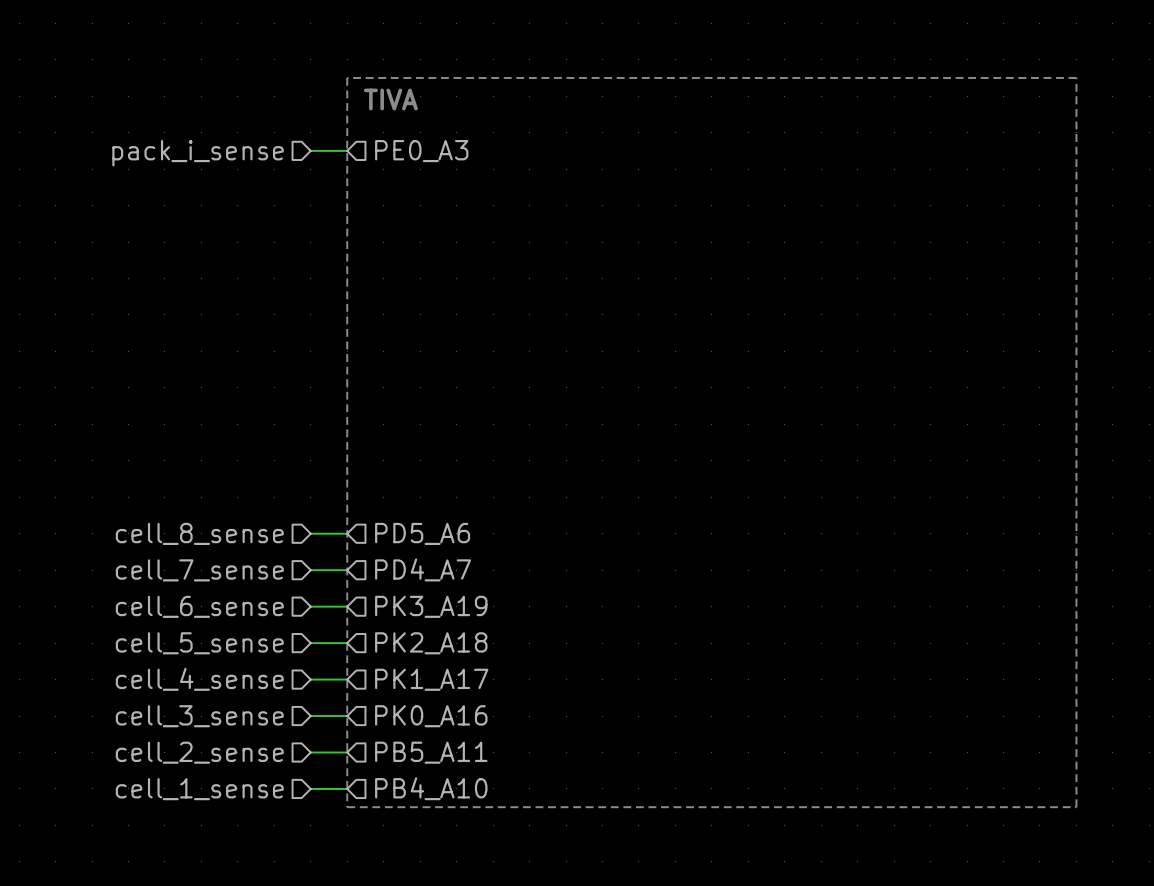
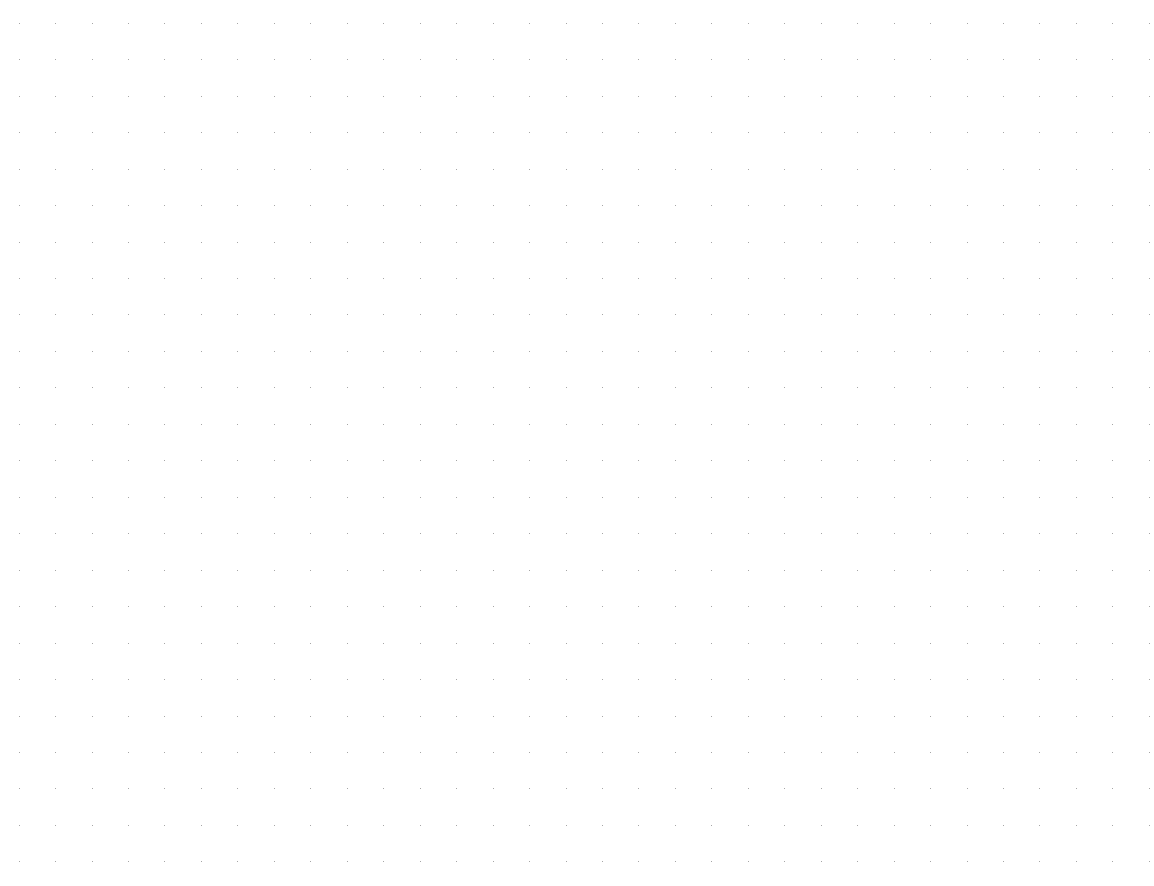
line: (347, 77) (347, 807) (1076, 807) (1076, 77) (347, 77) -> none
text: TIVA (390, 99) -> none
wire: (310, 150) (347, 150) -> none
hierarchical label: PE0_A3 (421, 151) -> none
hierarchical label: pack_i_sense (198, 153) -> none
hierarchical label: cell_8_sense (199, 533) -> none
wire: (310, 533) (347, 533) -> none
hierarchical label: PD5_A6 (422, 533) -> none
hierarchical label: PD4_A7 (423, 569) -> none
hierarchical label: cell_7_sense (199, 570) -> none
wire: (310, 570) (347, 570) -> none
hierarchical label: cell_6_sense (199, 606) -> none
wire: (310, 606) (347, 606) -> none
hierarchical label: PK3_A19 (431, 606) -> none
hierarchical label: cell_5_sense (199, 643) -> none
wire: (310, 643) (347, 643) -> none
hierarchical label: PK2_A18 (431, 643) -> none
hierarchical label: cell_4_sense (199, 679) -> none
wire: (310, 679) (347, 679) -> none
hierarchical label: PK1_A17 (431, 679) -> none
hierarchical label: cell_3_sense (199, 716) -> none
wire: (310, 716) (347, 716) -> none
hierarchical label: PK0_A16 (431, 716) -> none
hierarchical label: cell_2_sense (199, 752) -> none
wire: (310, 752) (347, 752) -> none
hierarchical label: PB5_A11 (431, 752) -> none
wire: (310, 788) (347, 788) -> none
hierarchical label: PB4_A10 (431, 788) -> none
hierarchical label: cell_1_sense (199, 789) -> none

